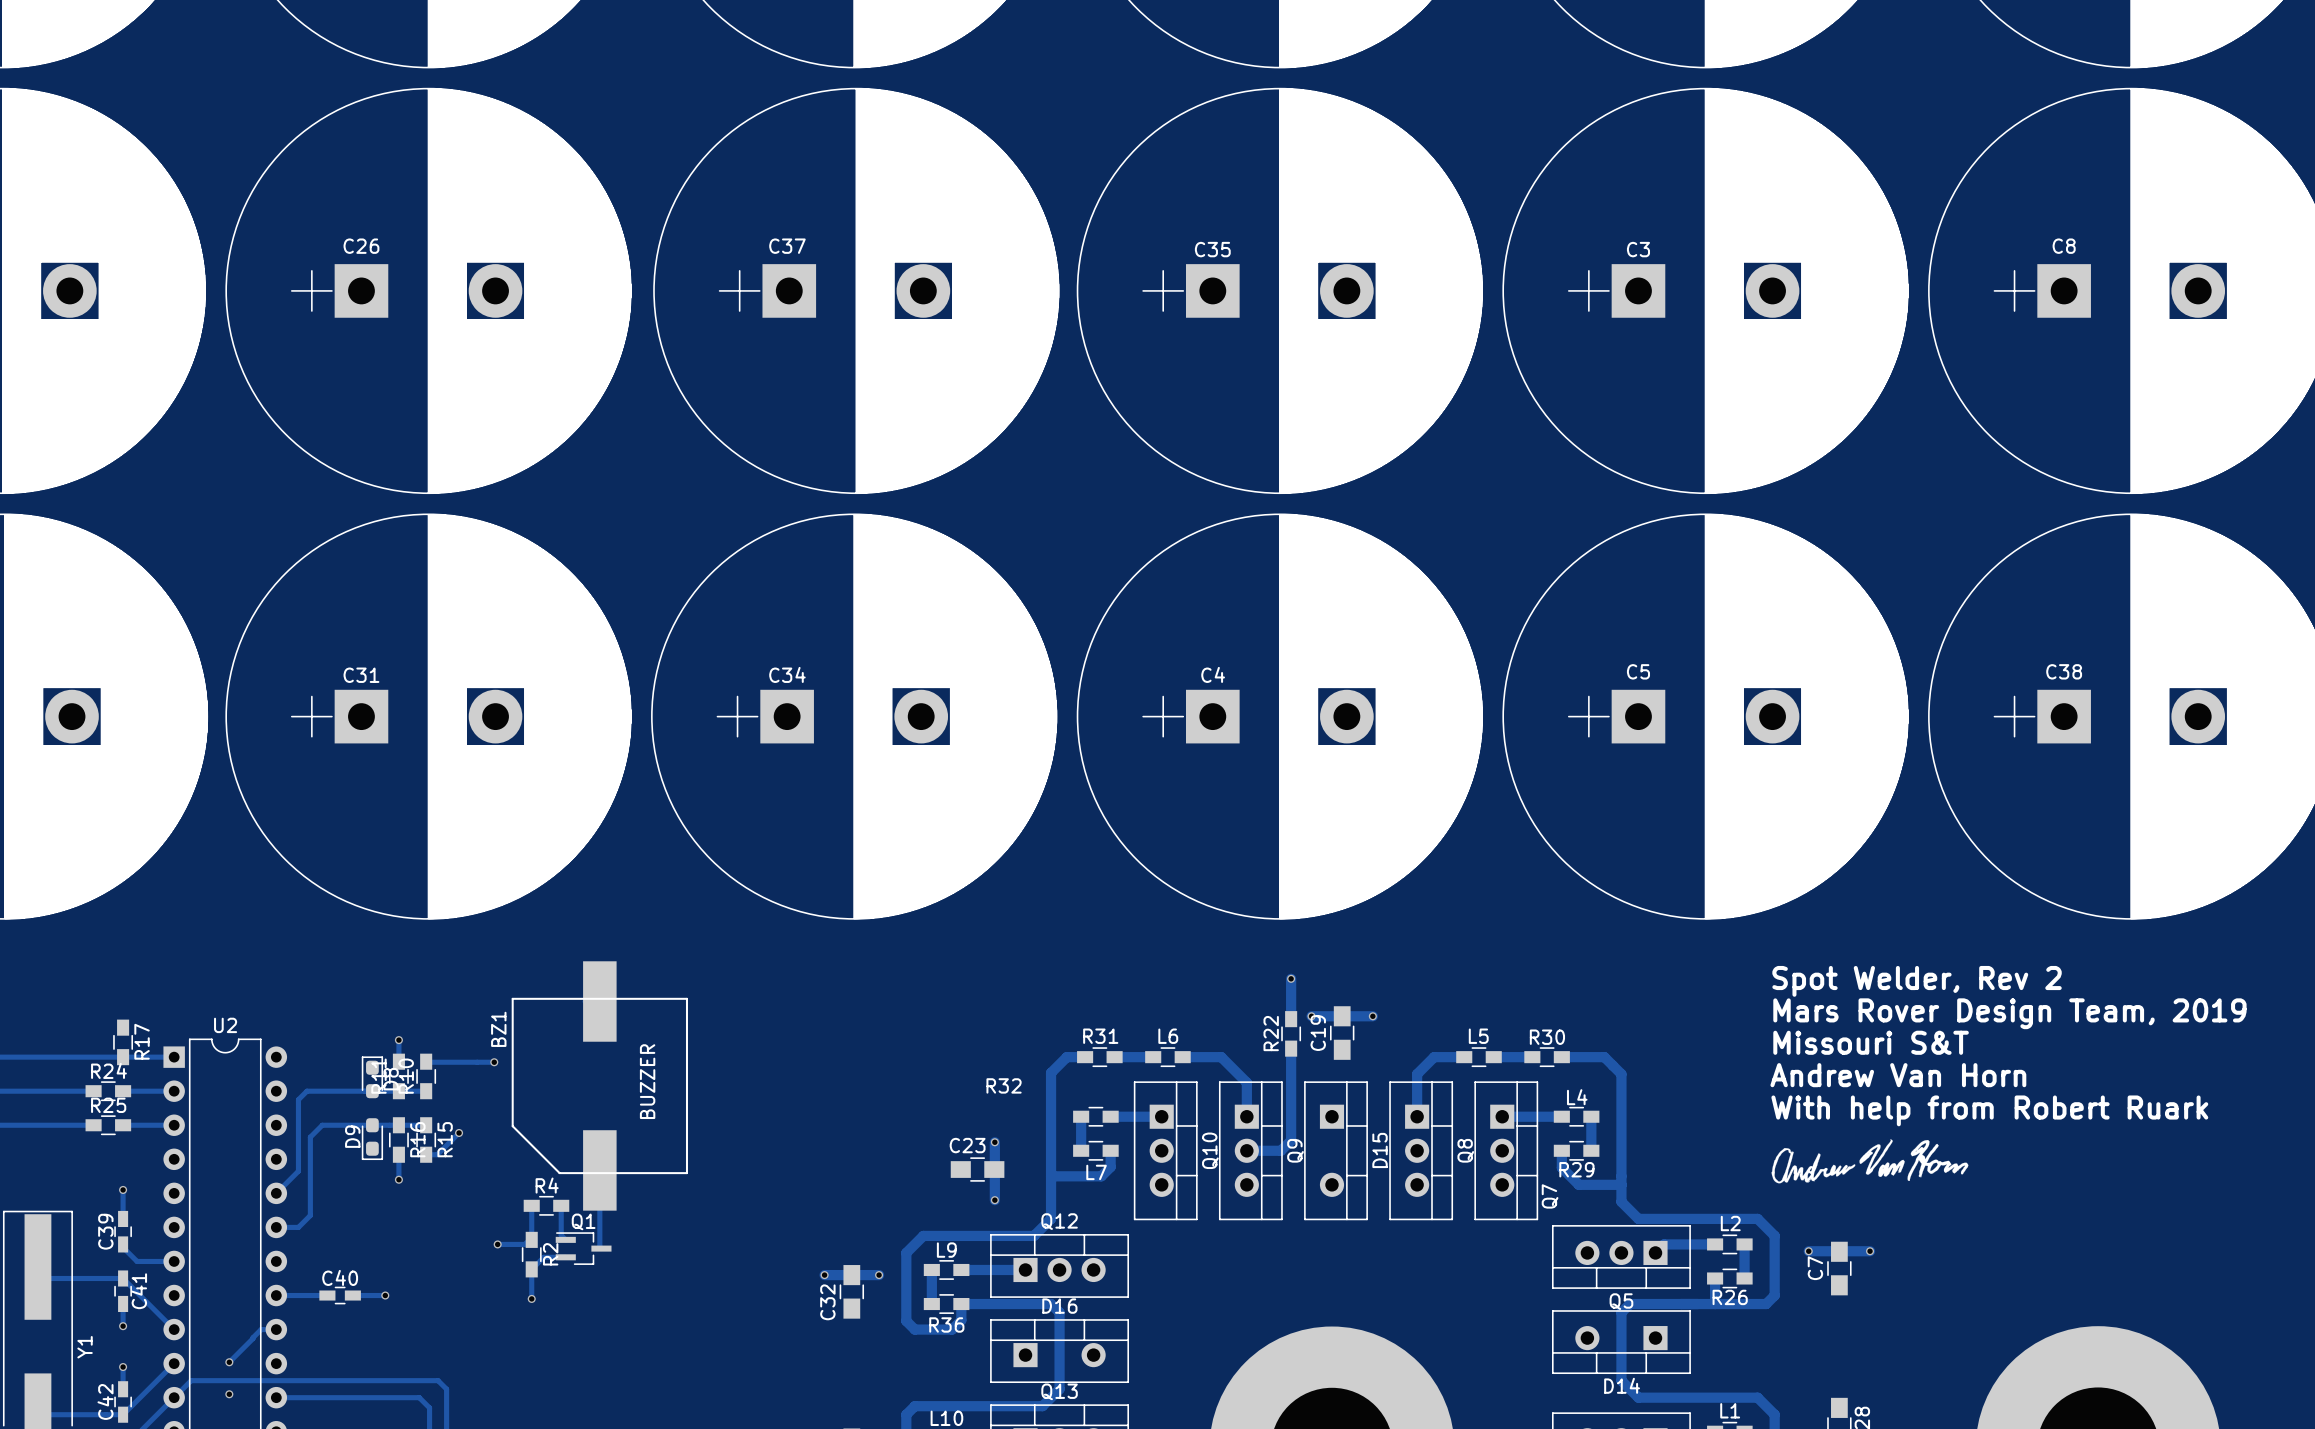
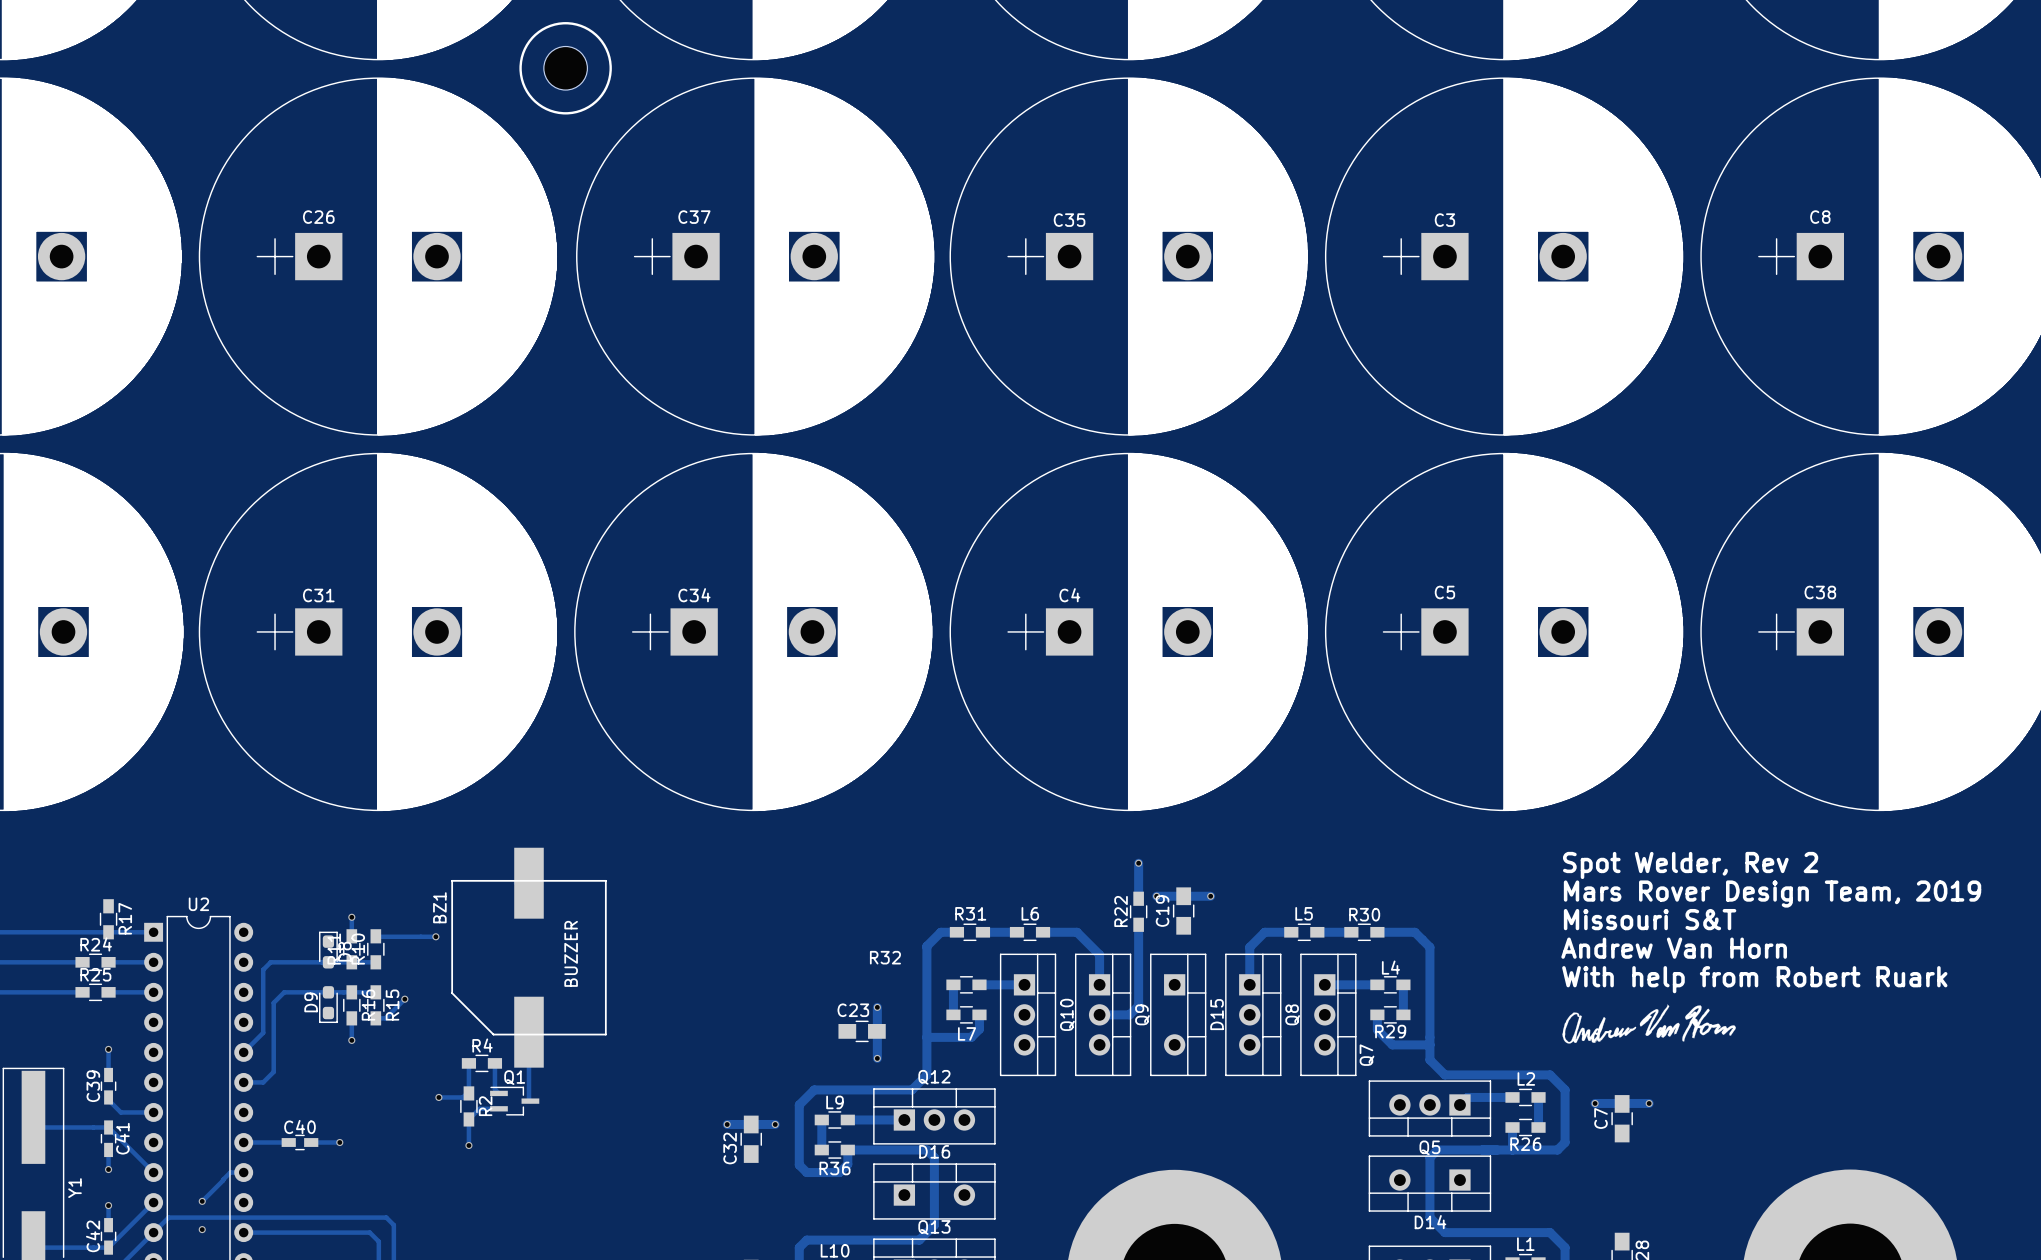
drawing: none -> [519, 22, 612, 115]
part: none -> (565, 68)

